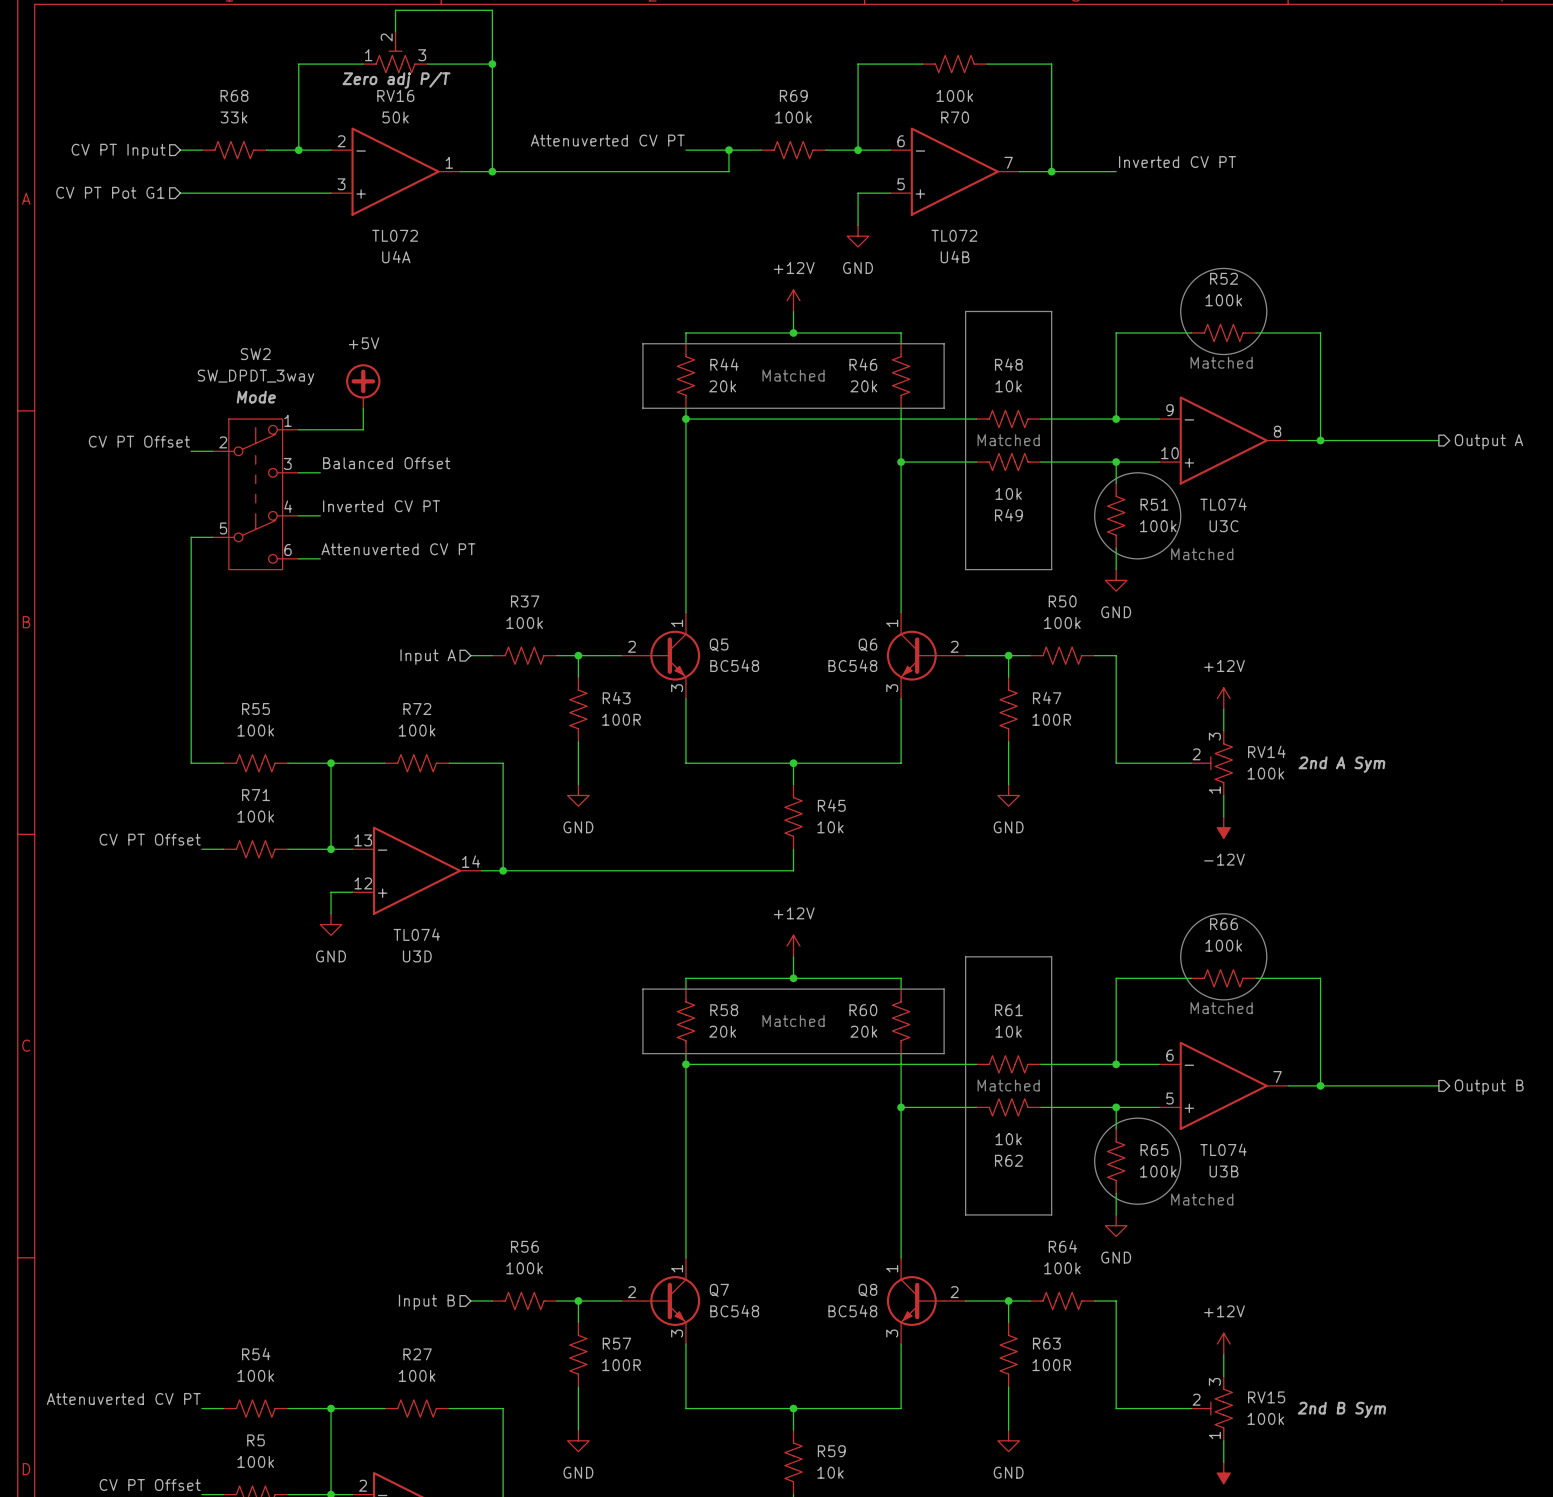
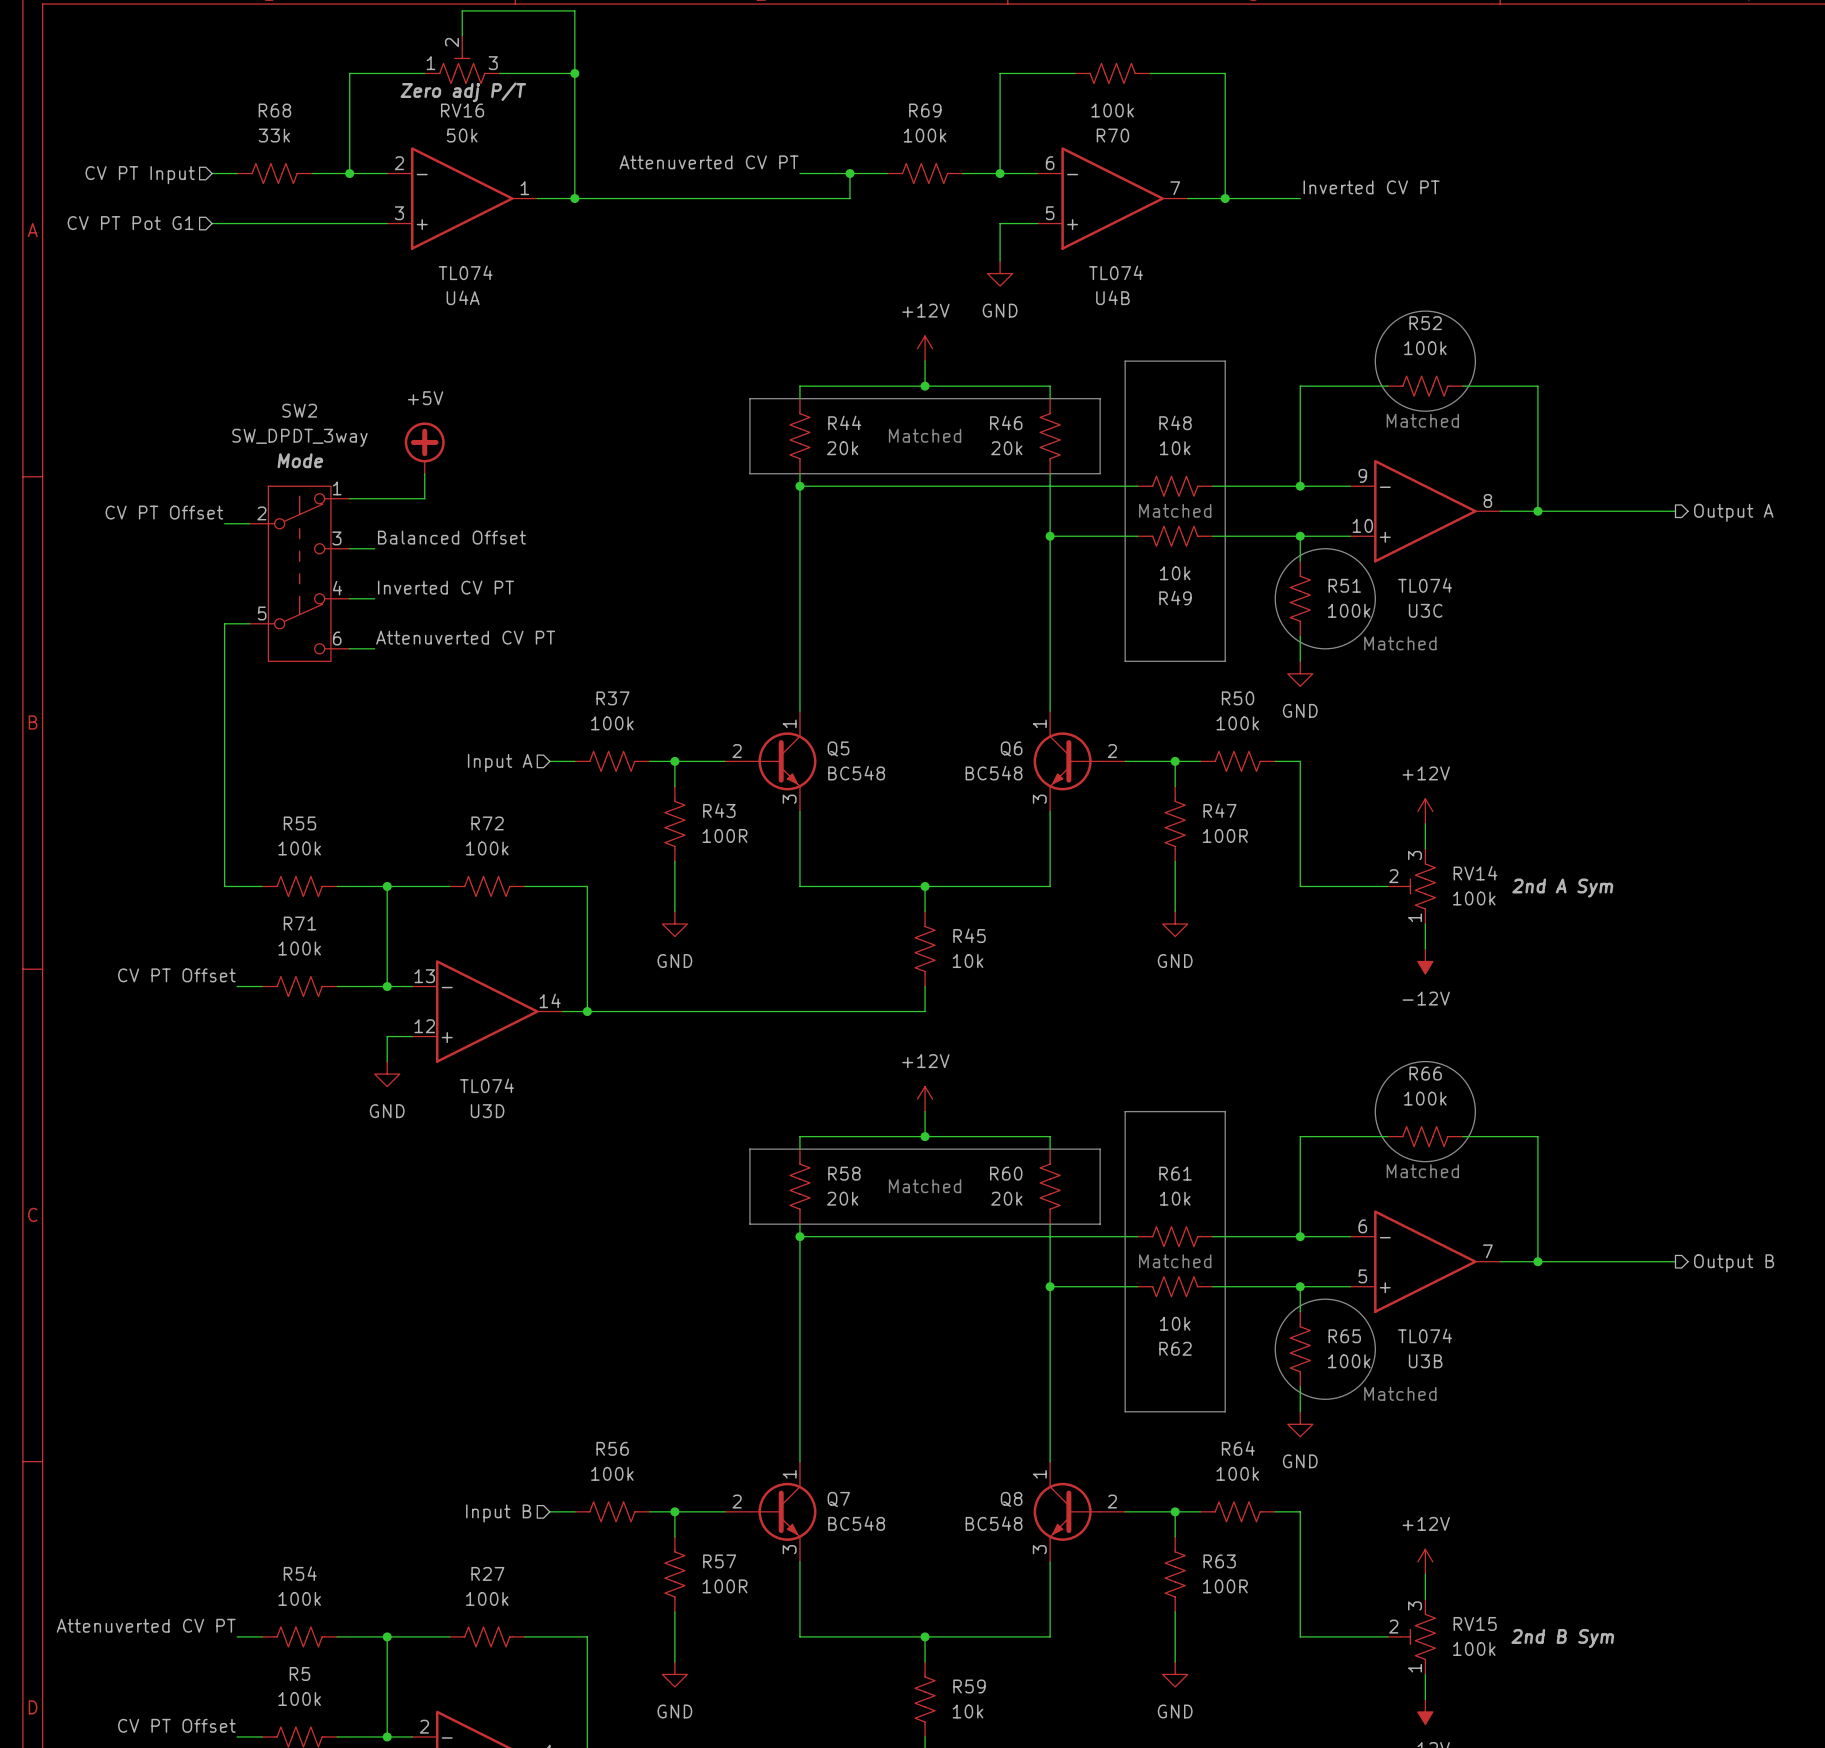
U4A value: TL072 (395, 235) -> TL074 (465, 272)
U4B value: TL072 (954, 235) -> TL074 (1116, 272)

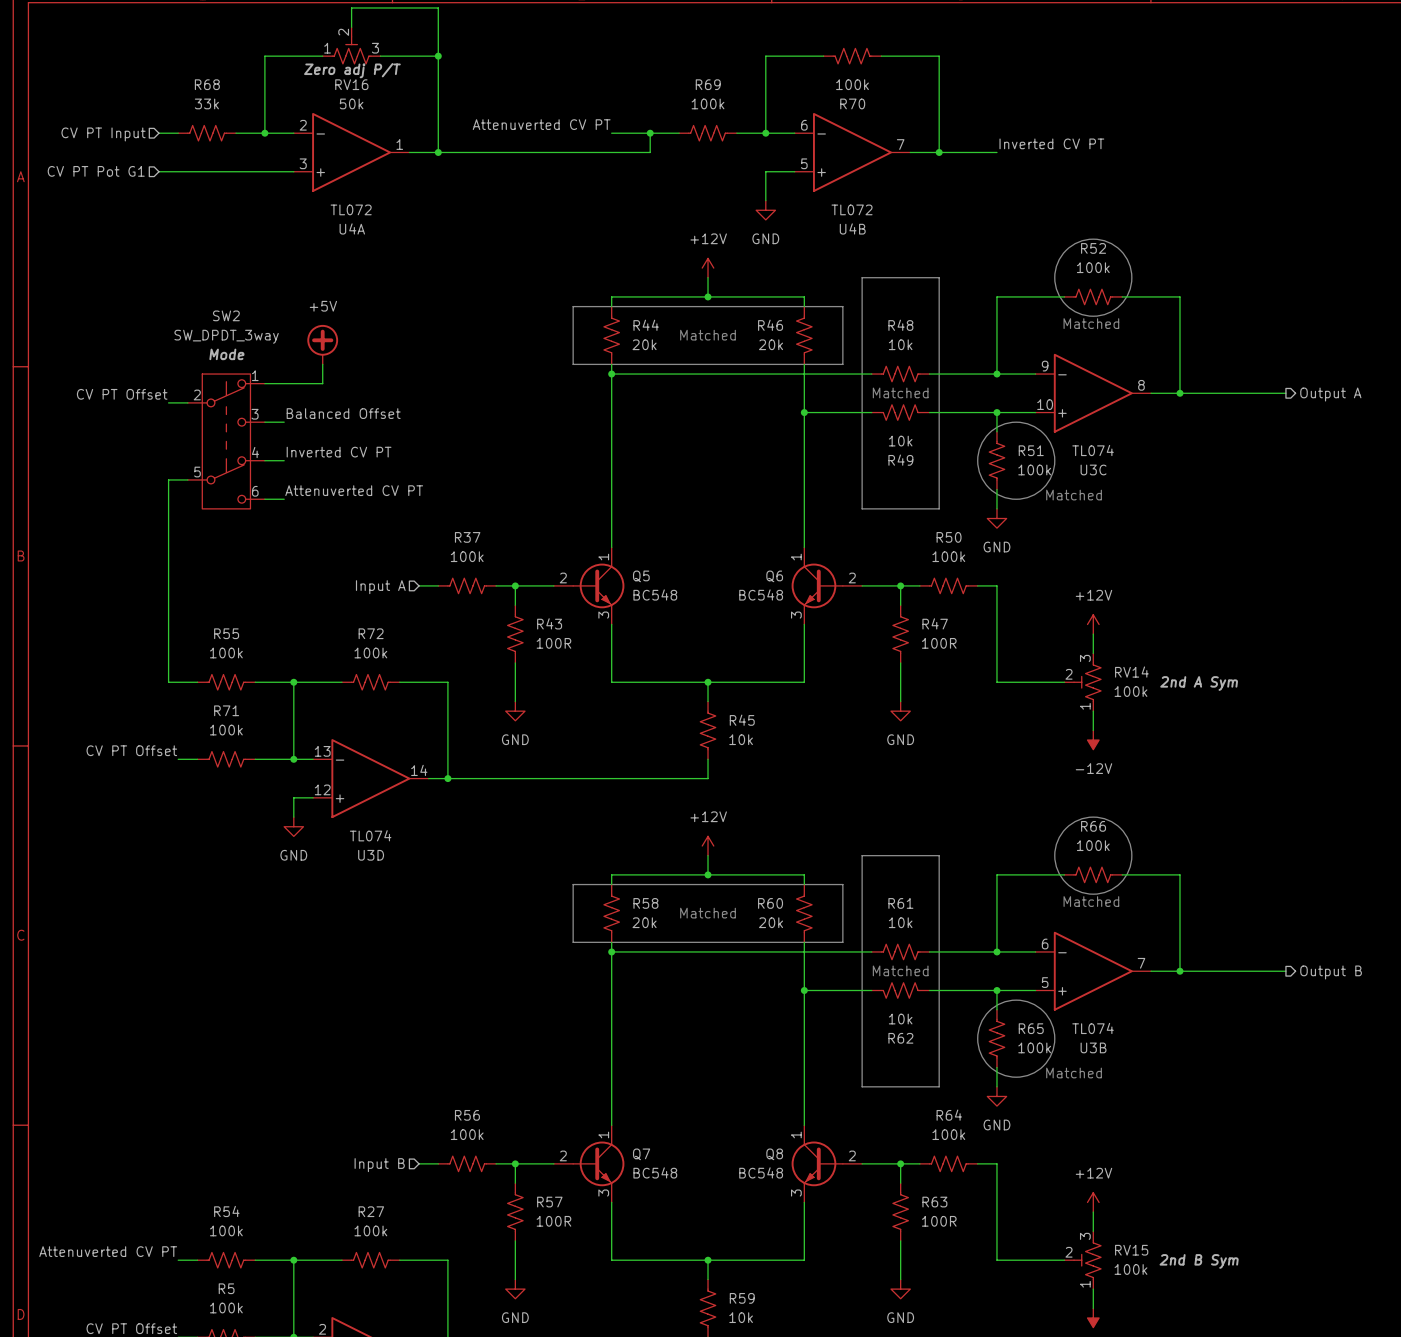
U4A value: TL074 (465, 272) -> TL072 (351, 209)
U4B value: TL074 (1116, 272) -> TL072 (852, 209)

